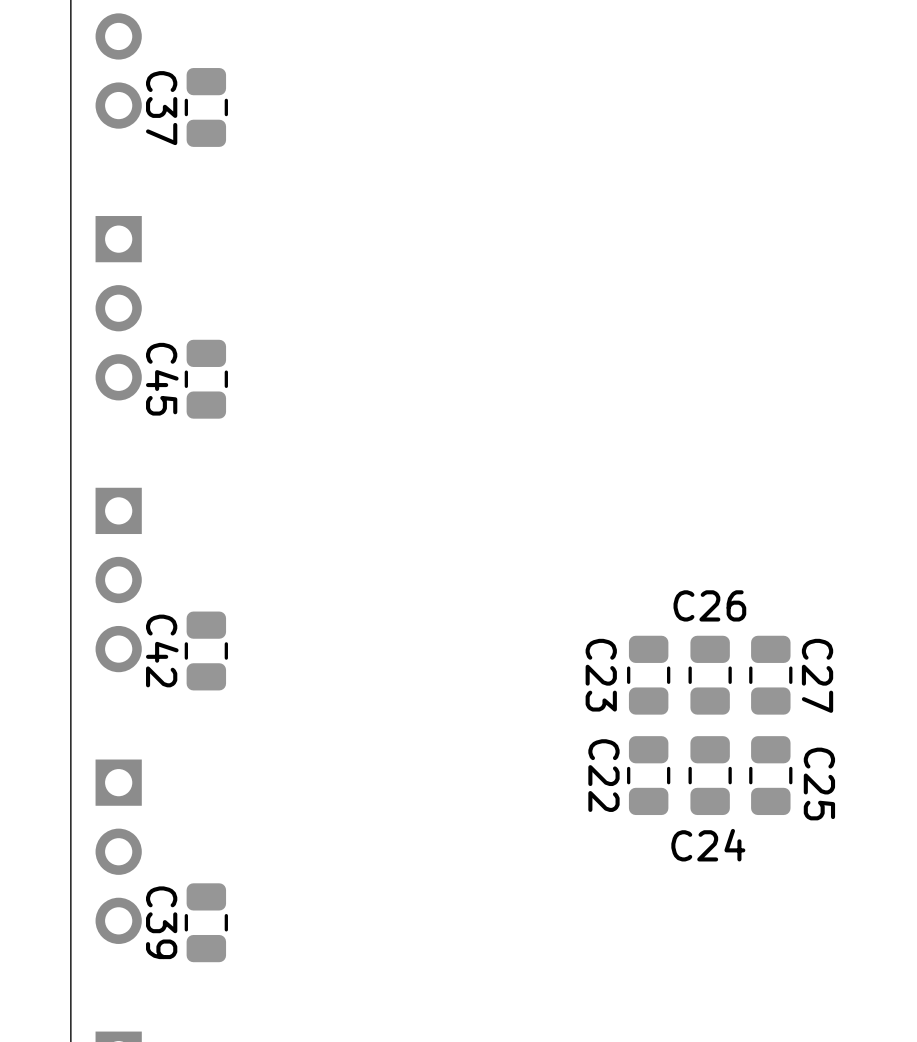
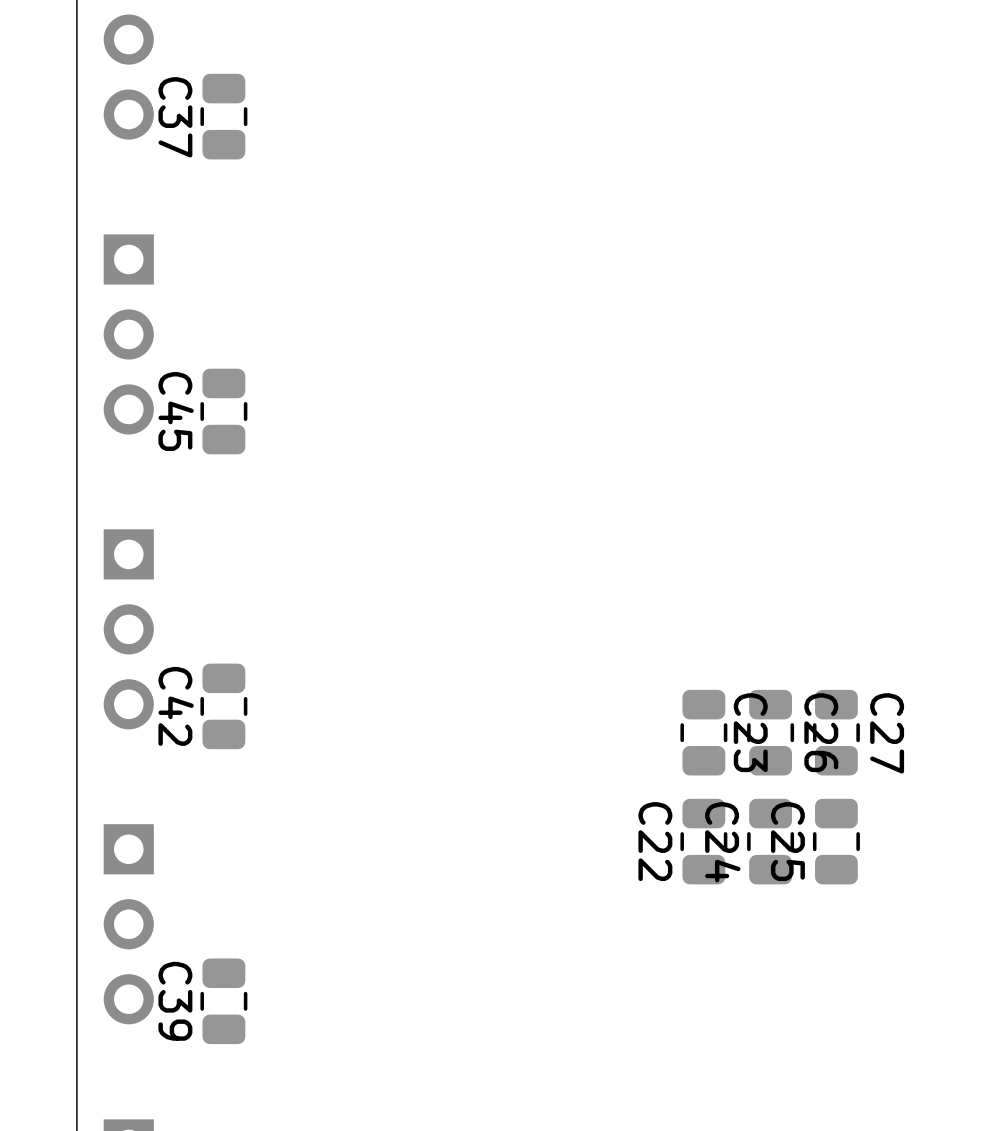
C26 name rotation: 0° (709, 605) -> 90° clockwise (821, 732)
C23 name position: C23 (601, 675) -> C23 (750, 732)
C25 name position: C25 (819, 784) -> C25 (787, 841)
C24 name rotation: 0° (708, 845) -> 90° clockwise (722, 842)

